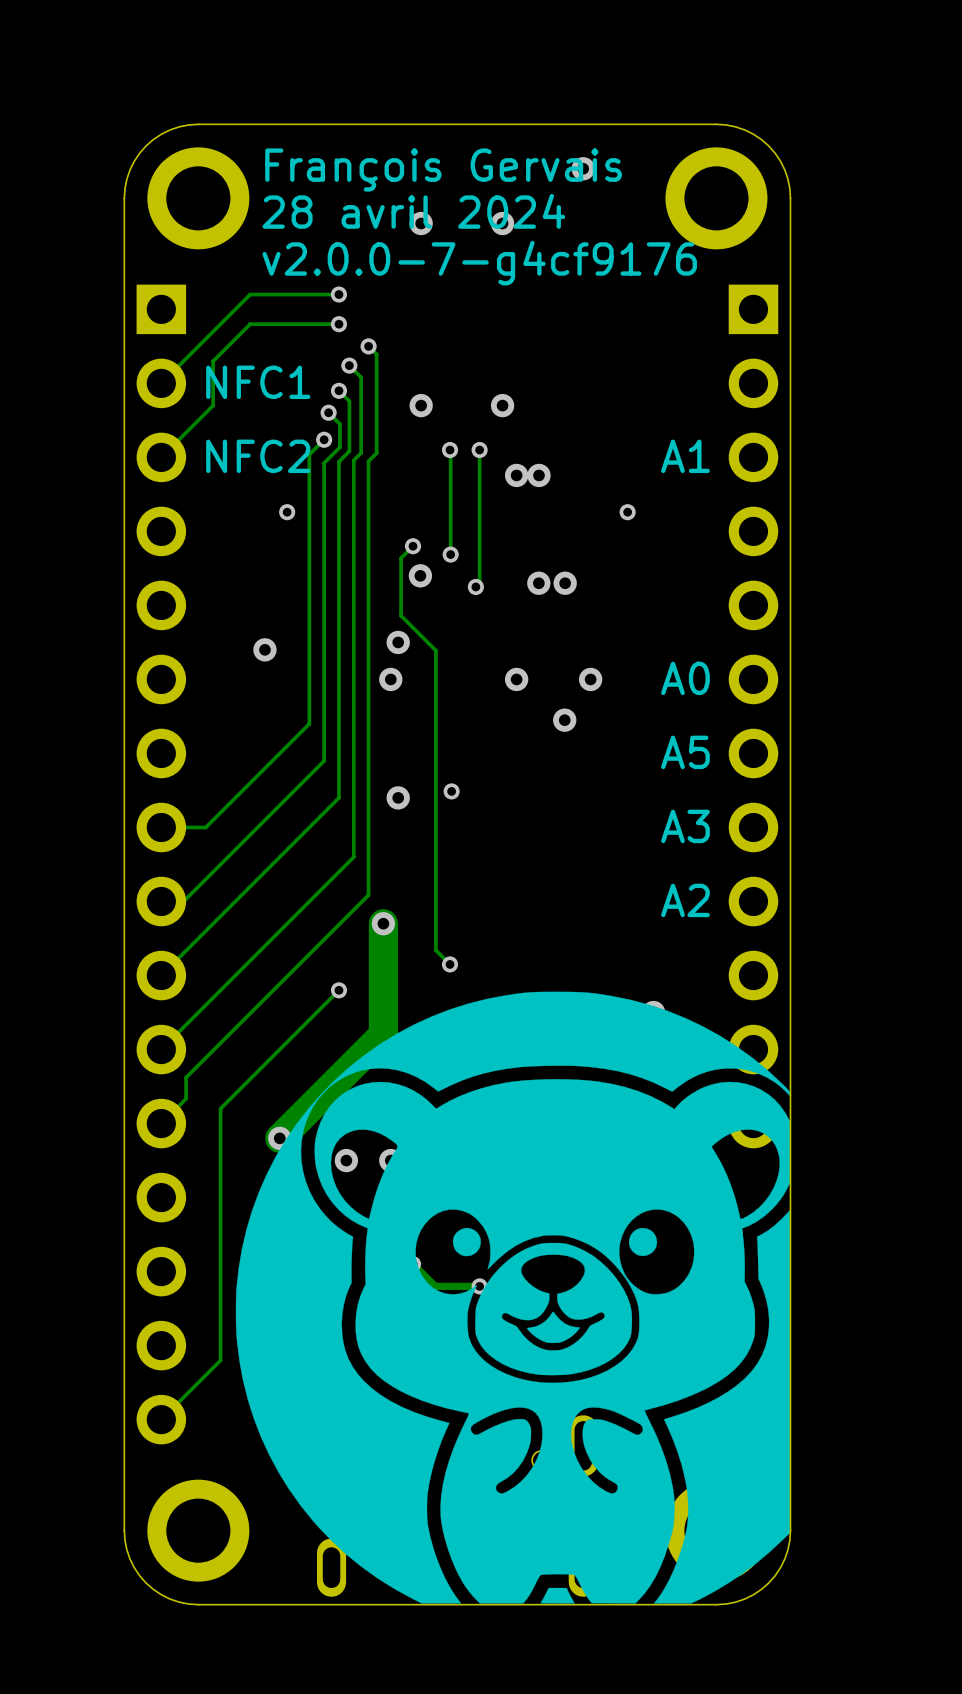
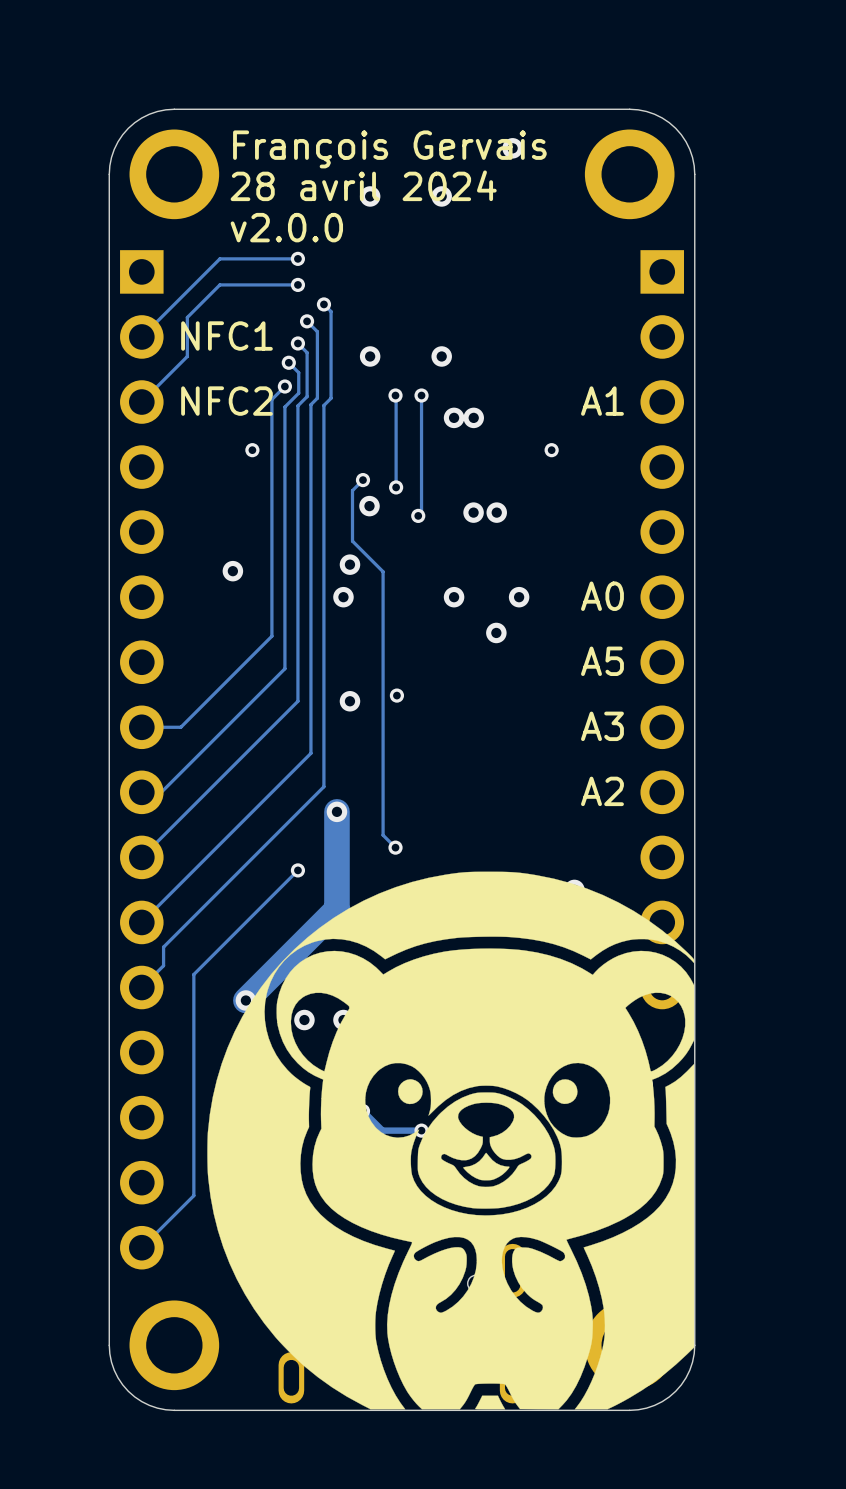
text: v2.0.0-7-g4cf9176 (479, 263) -> v2.0.0 (286, 227)

